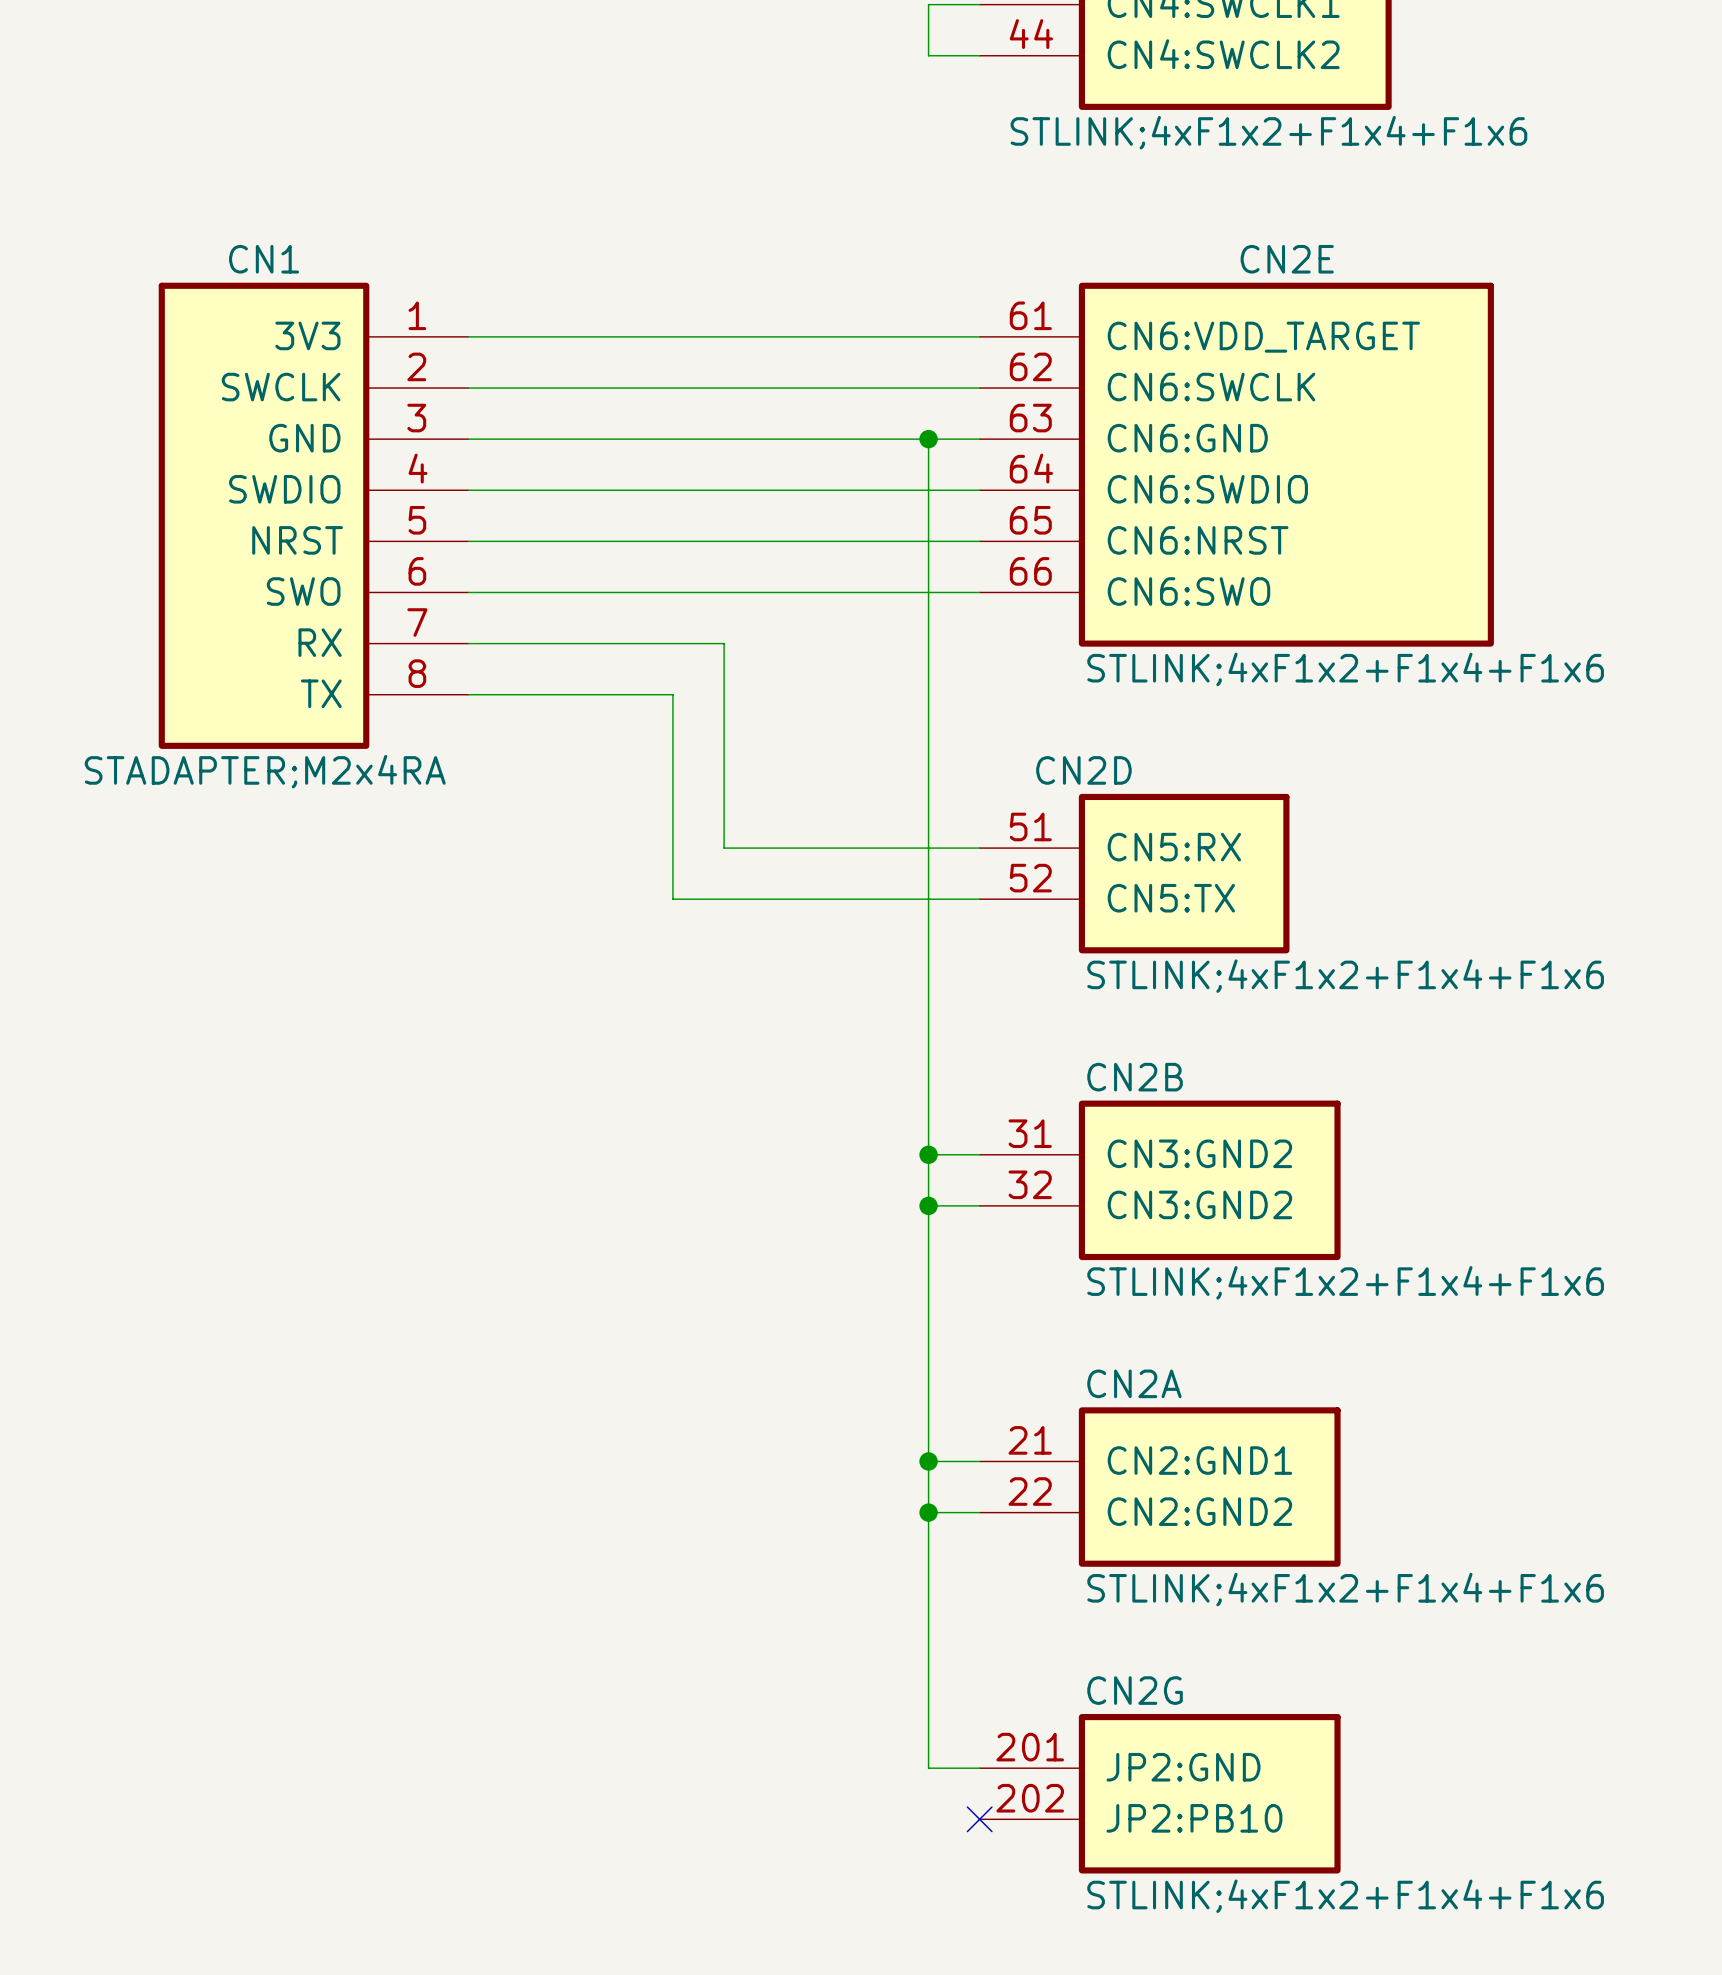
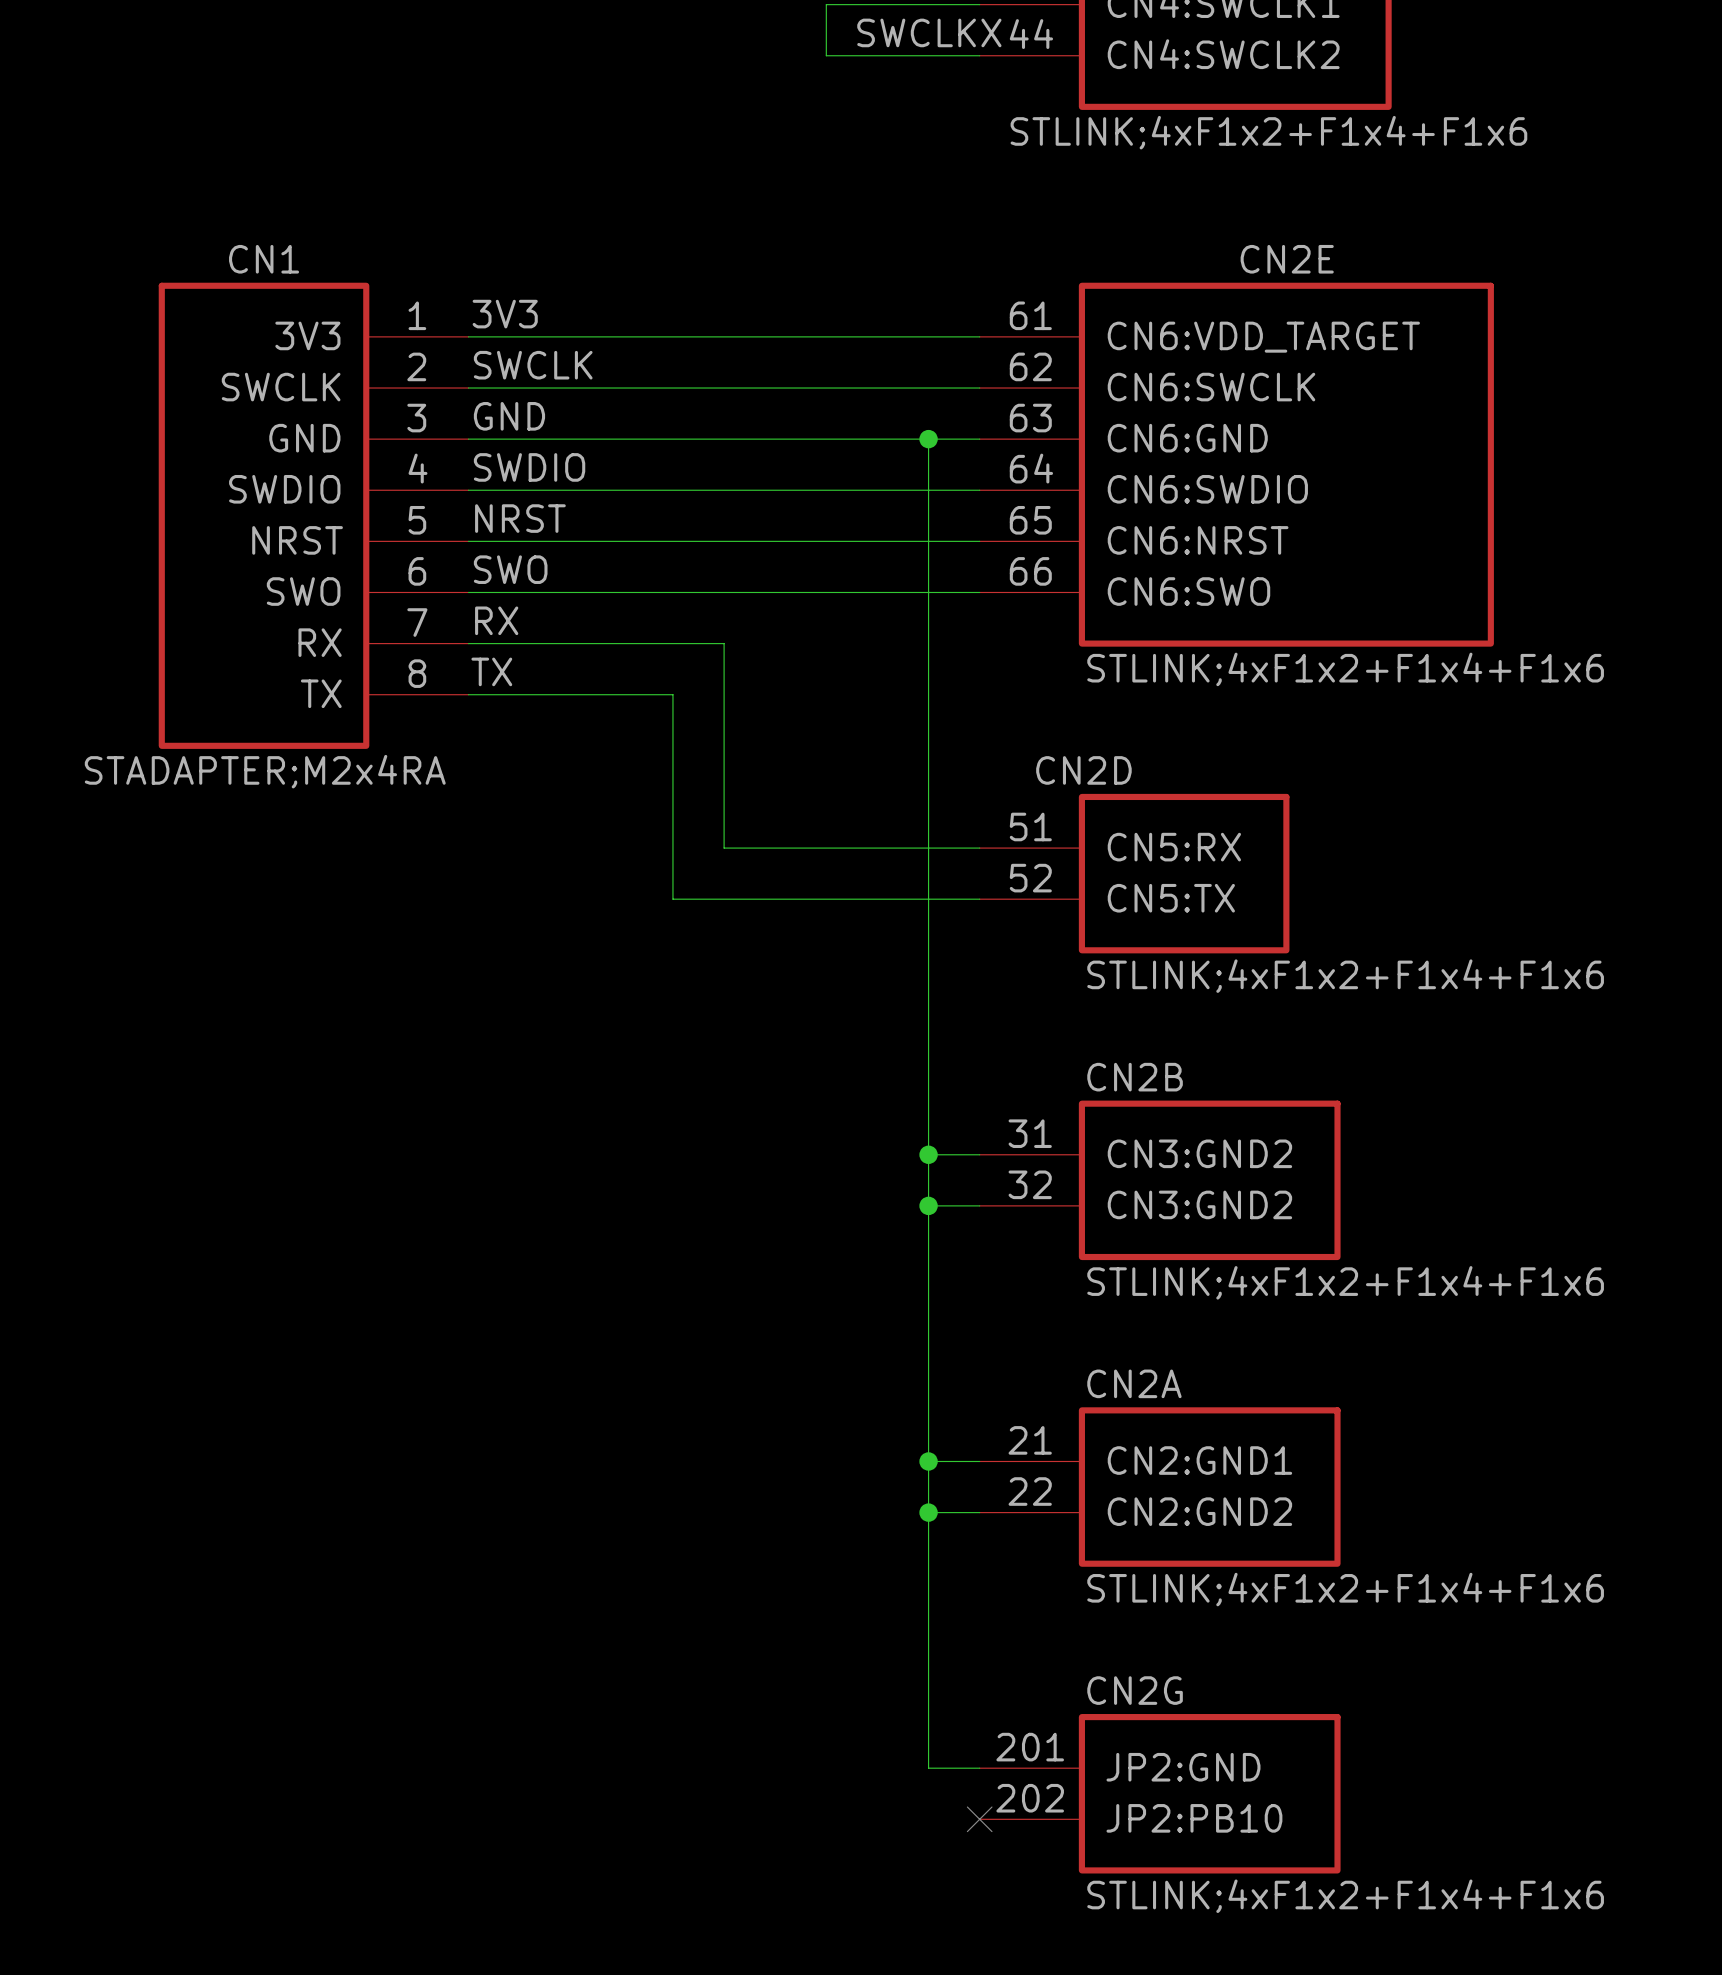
wire: (928, 4) (928, 55) -> (928, 4) (826, 4) (826, 55) (928, 55)
label: none -> SWCLKX (929, 32)
label: none -> 3V3 (505, 314)
label: none -> SWCLK (533, 365)
label: none -> GND (509, 416)
label: none -> SWDIO (529, 467)
label: none -> NRST (520, 518)
label: none -> SWO (510, 569)
label: none -> RX (496, 620)
label: none -> TX (491, 671)

